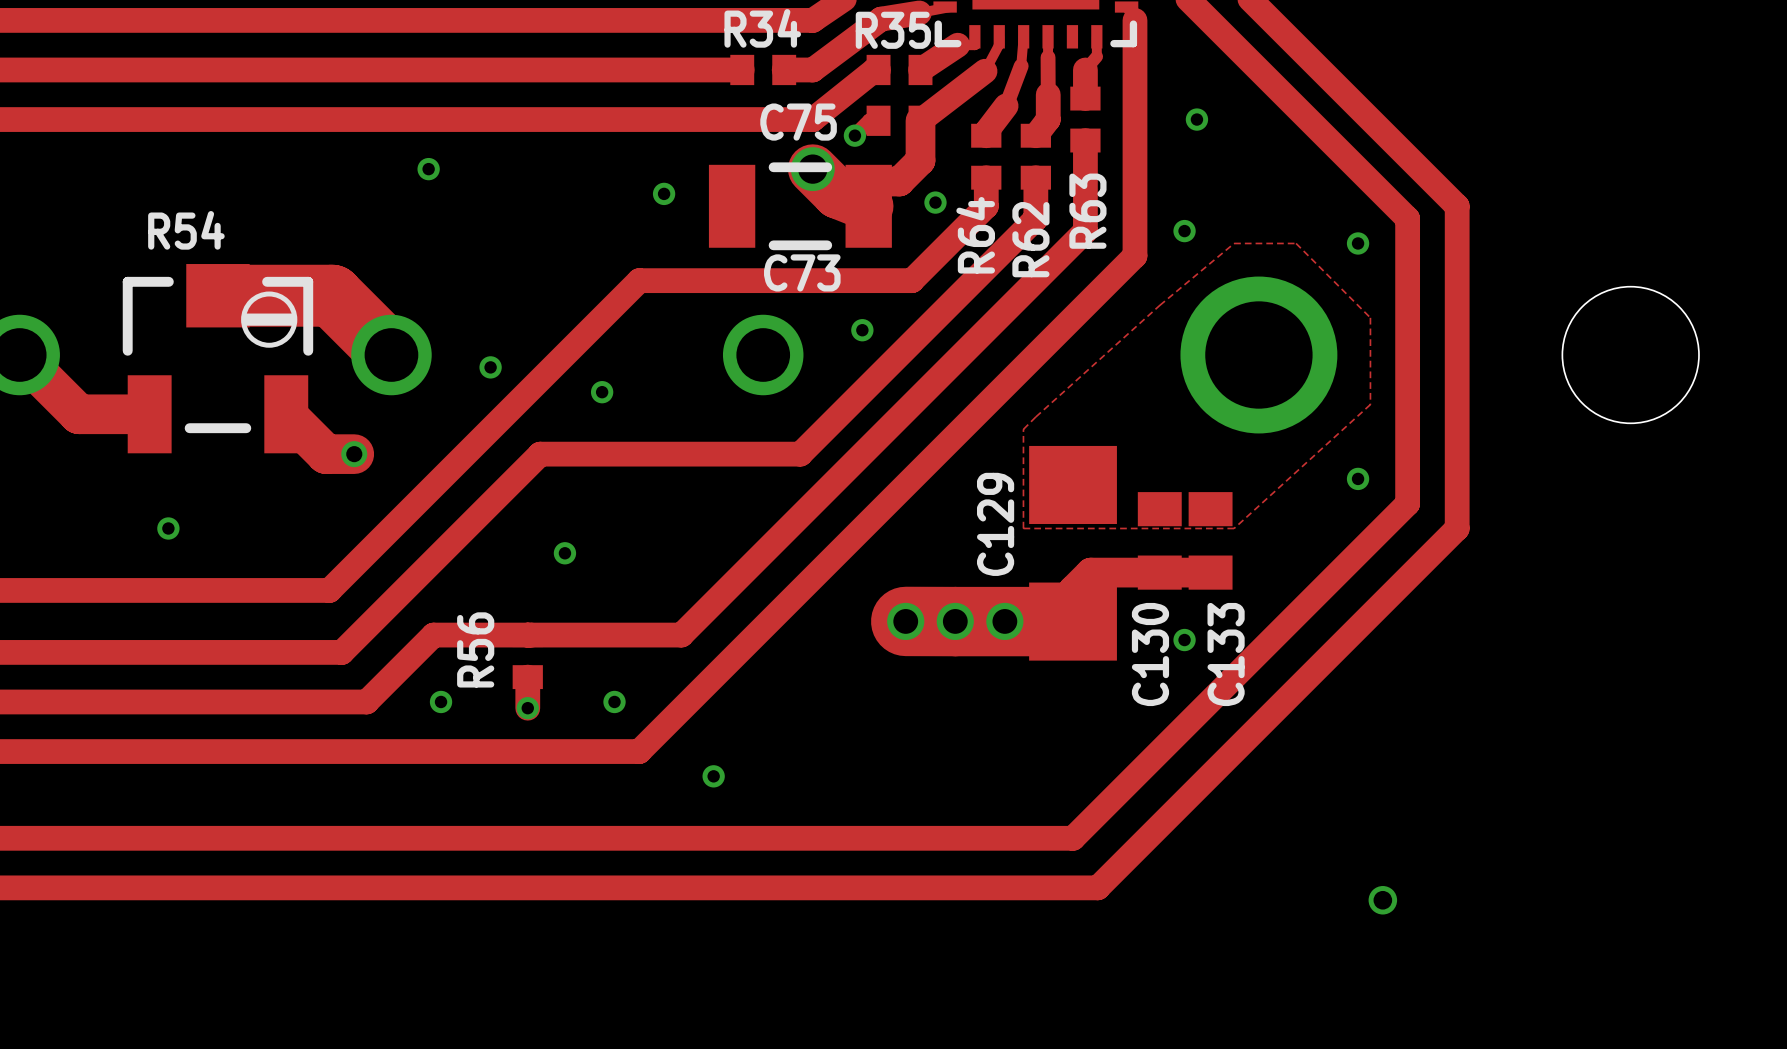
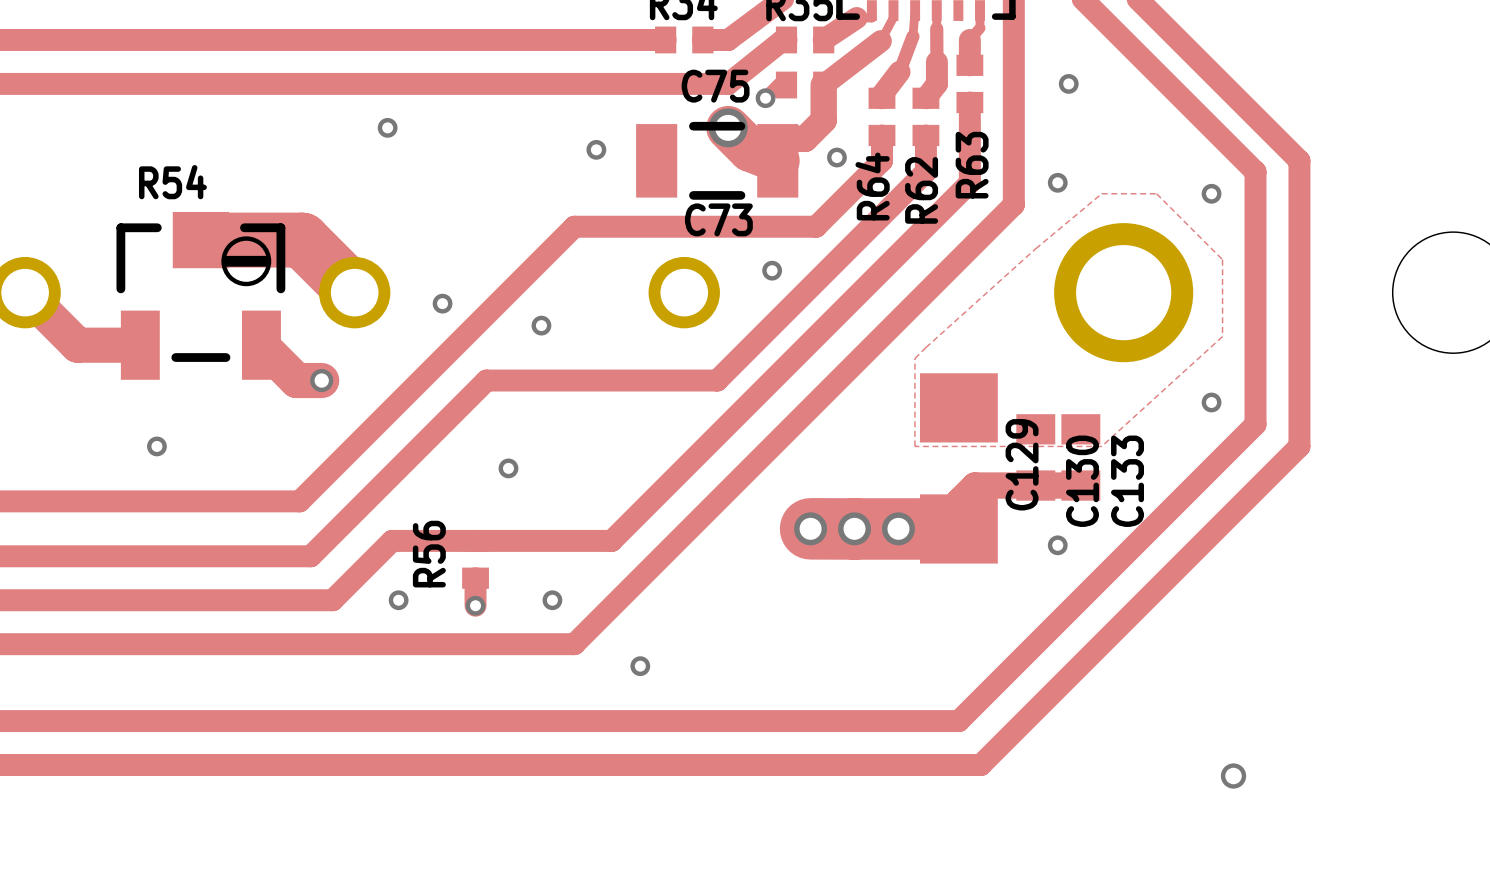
C129 name position: C129 (995, 524) -> C129 (1022, 464)
C130 name position: C130 (1150, 654) -> C130 (1082, 481)
C133 name position: C133 (1226, 654) -> C133 (1127, 481)

